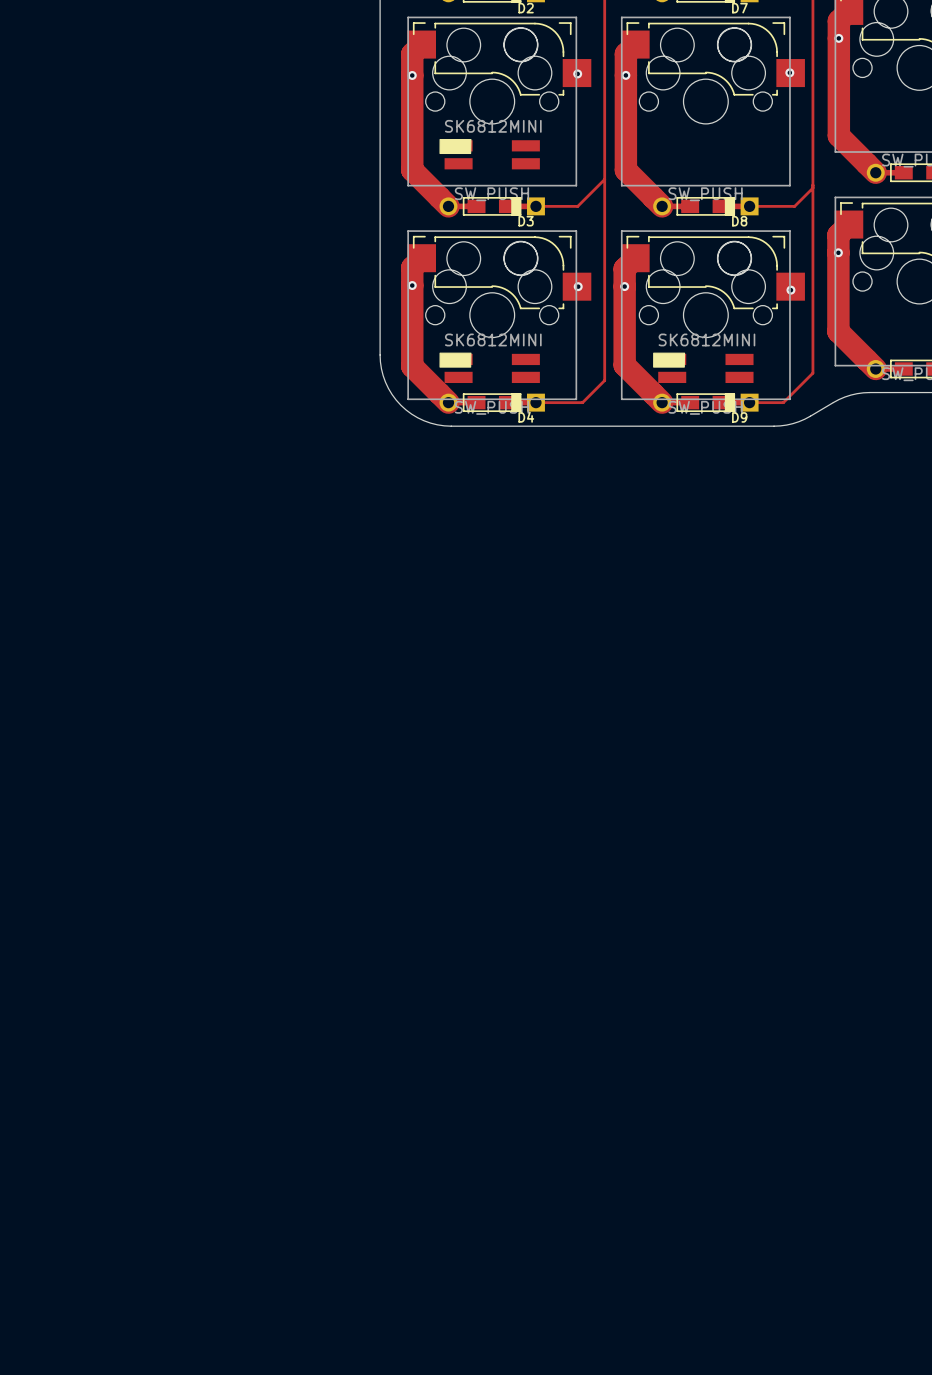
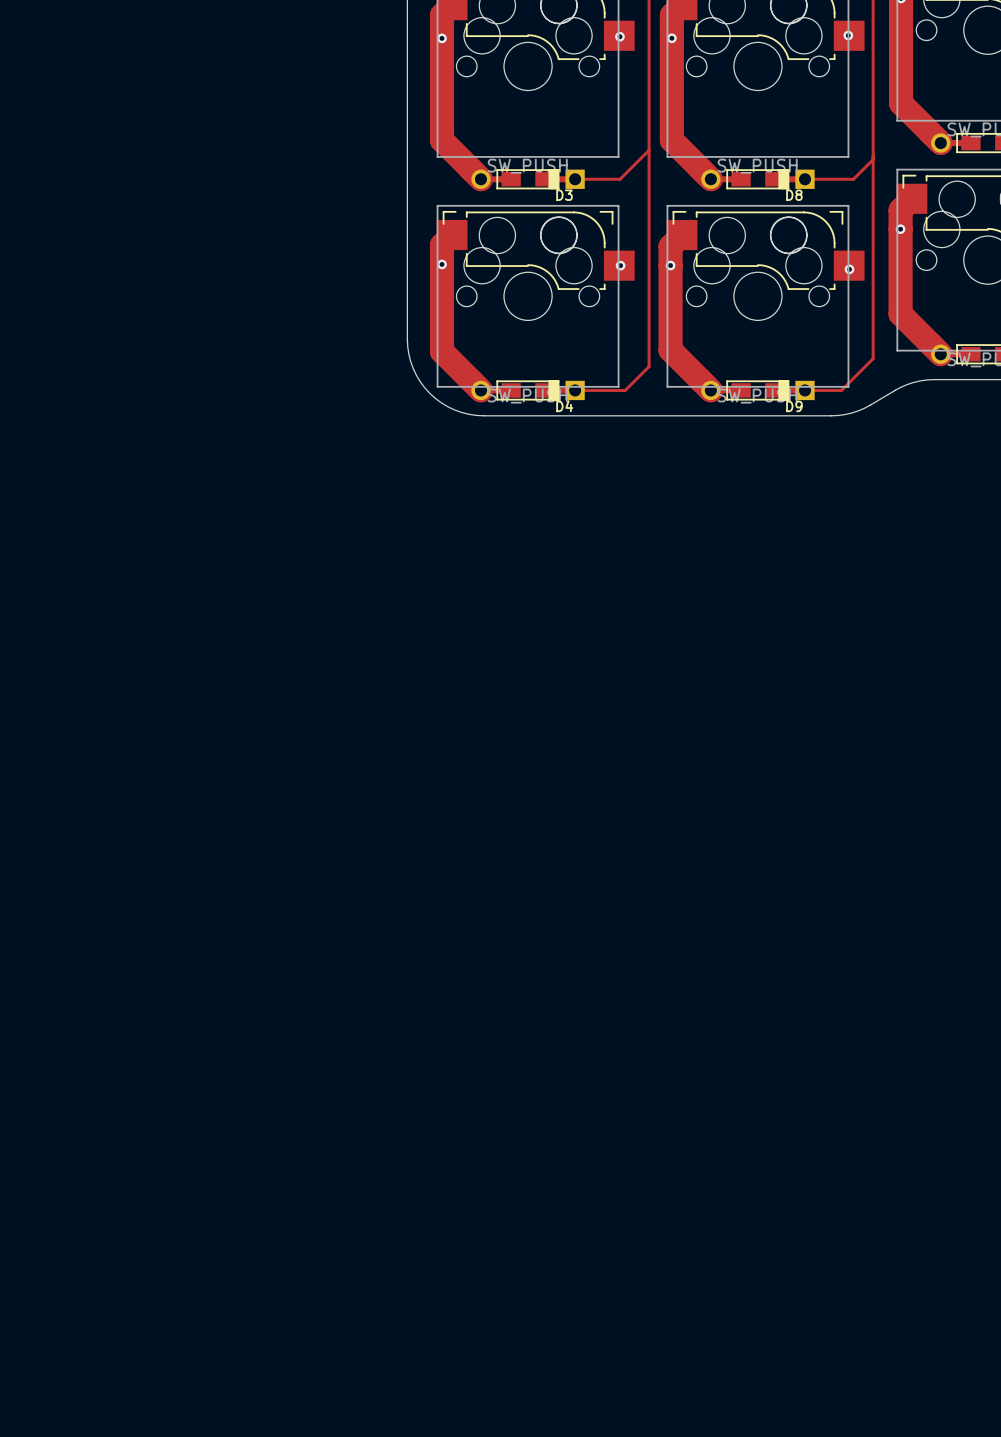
part: SK6812MINI (489, 154) -> none
part: SK6812MINI (489, 367) -> none
part: SK6812MINI (703, 367) -> none

